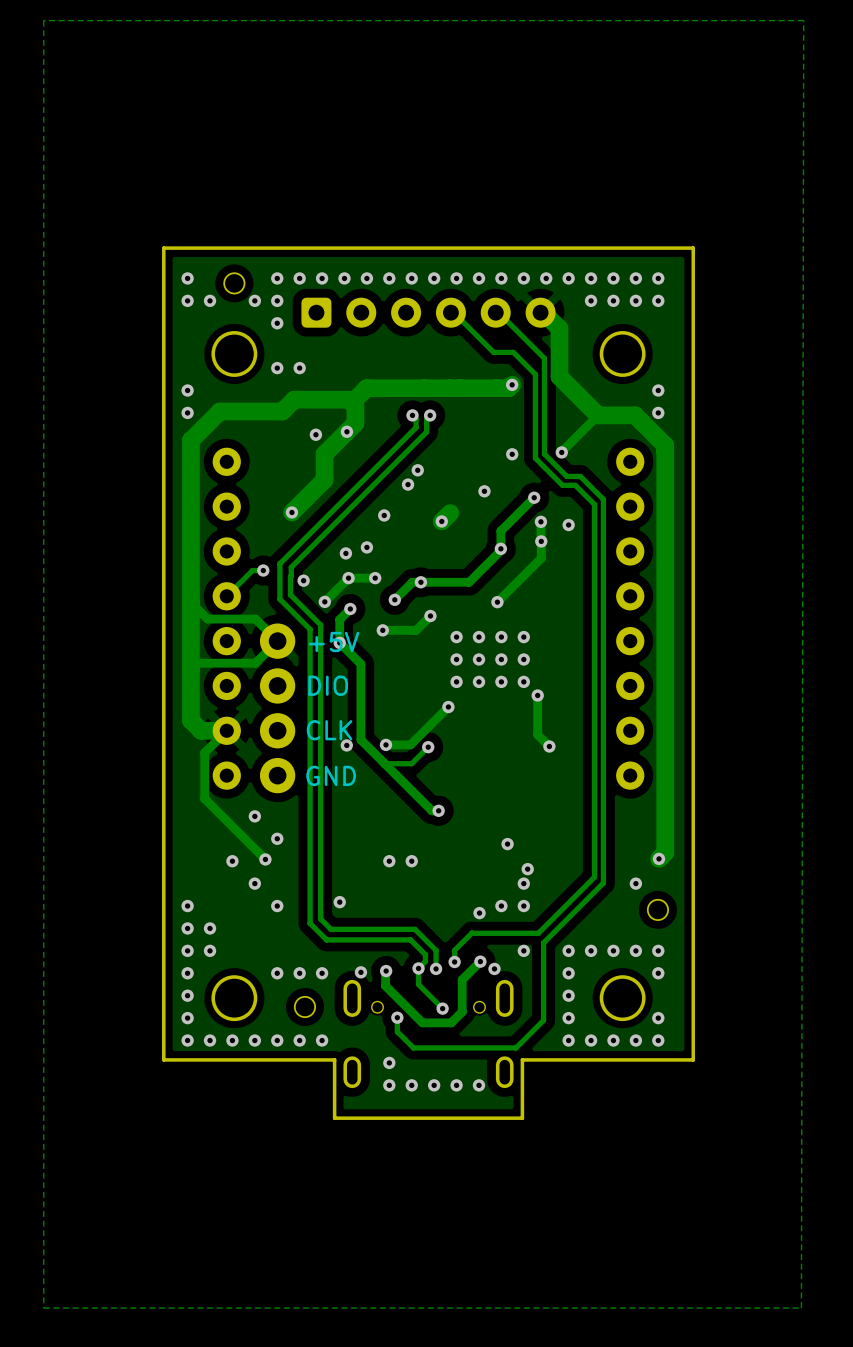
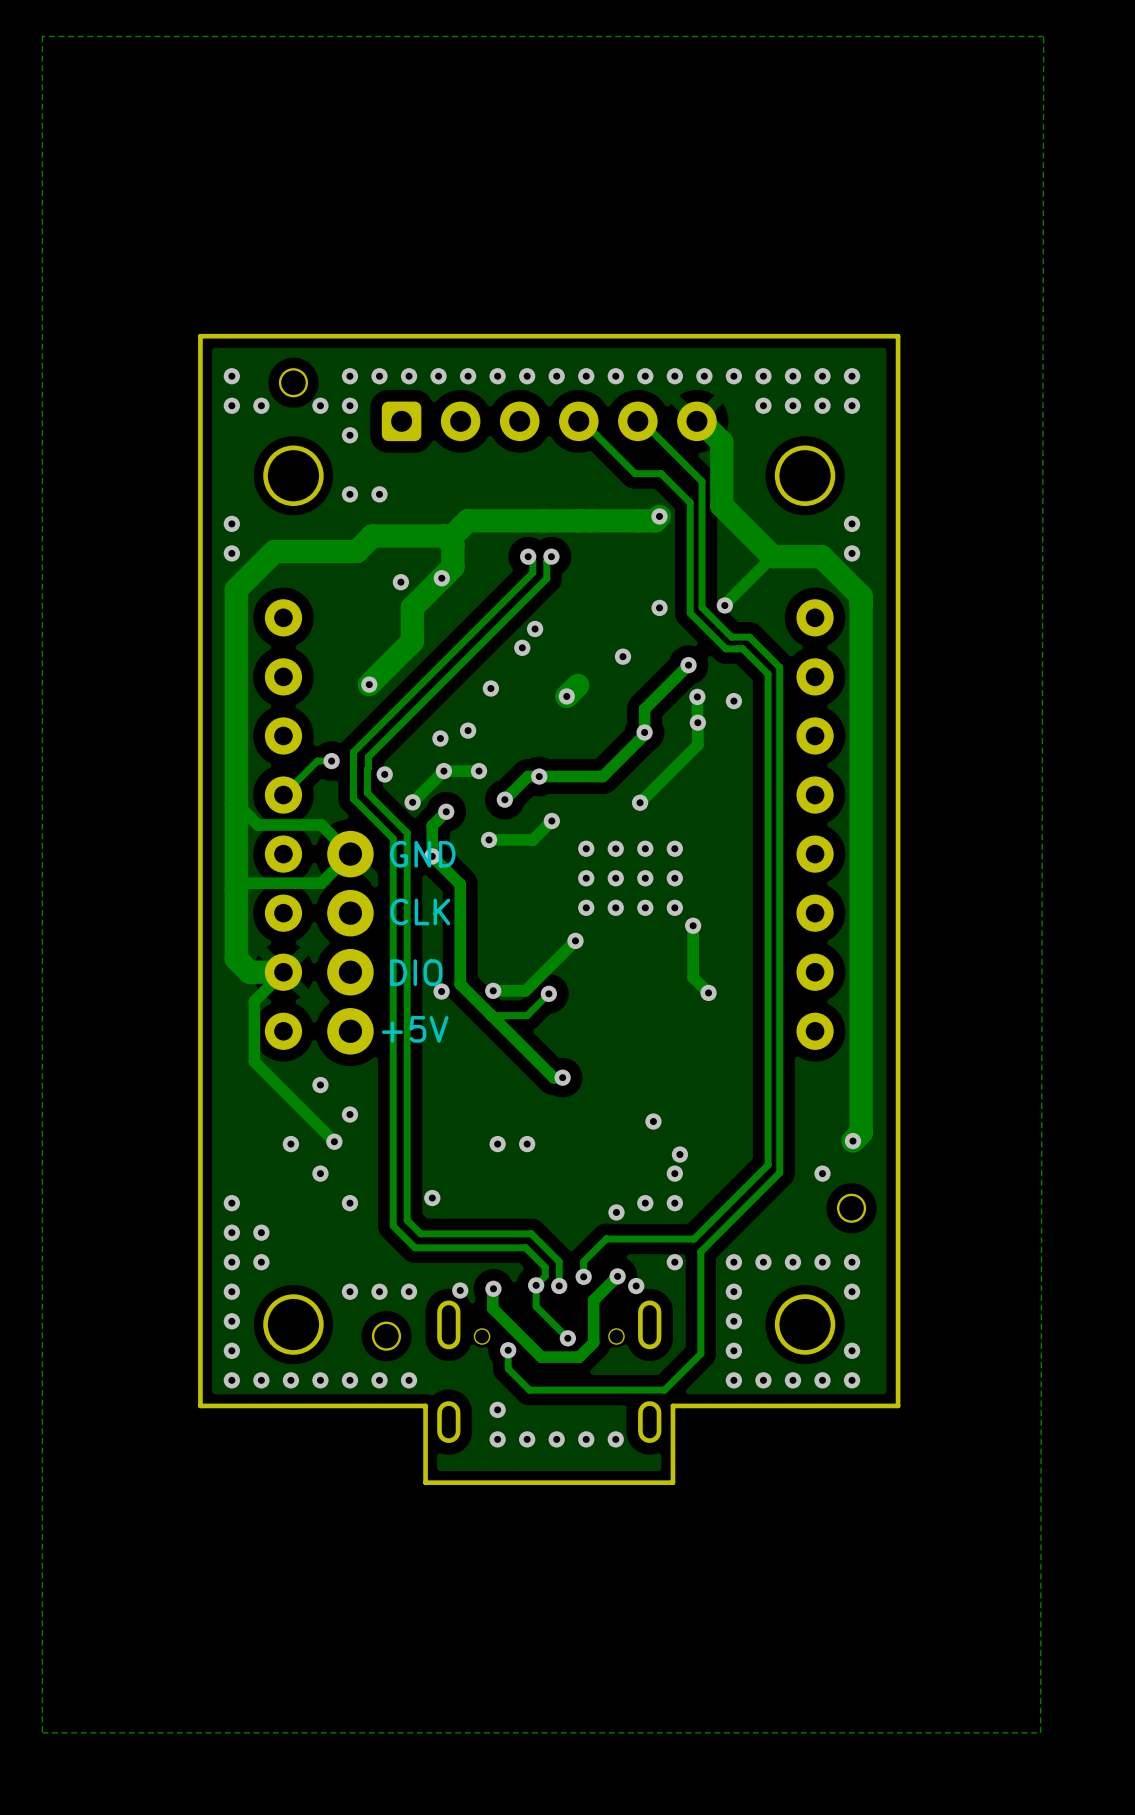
text: +5V (333, 641) -> GND (422, 854)
text: DIO (328, 685) -> CLK (420, 911)
text: CLK (329, 730) -> DIO (416, 972)
text: GND (331, 775) -> +5V (415, 1029)

